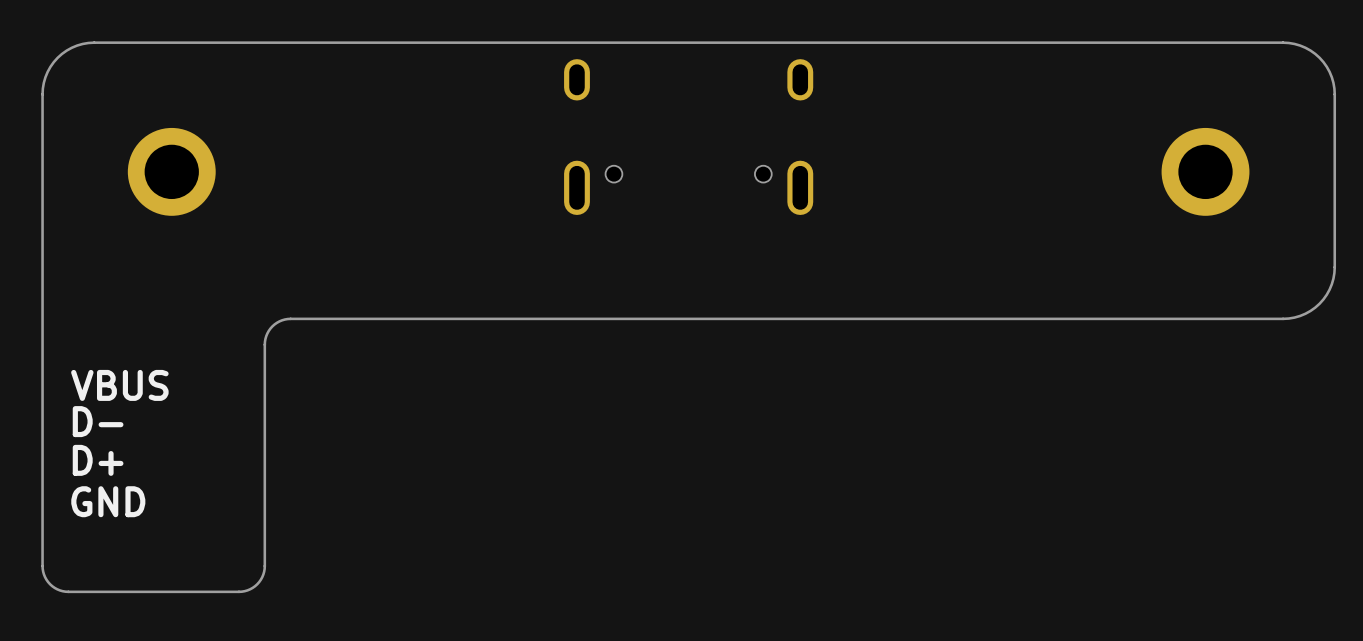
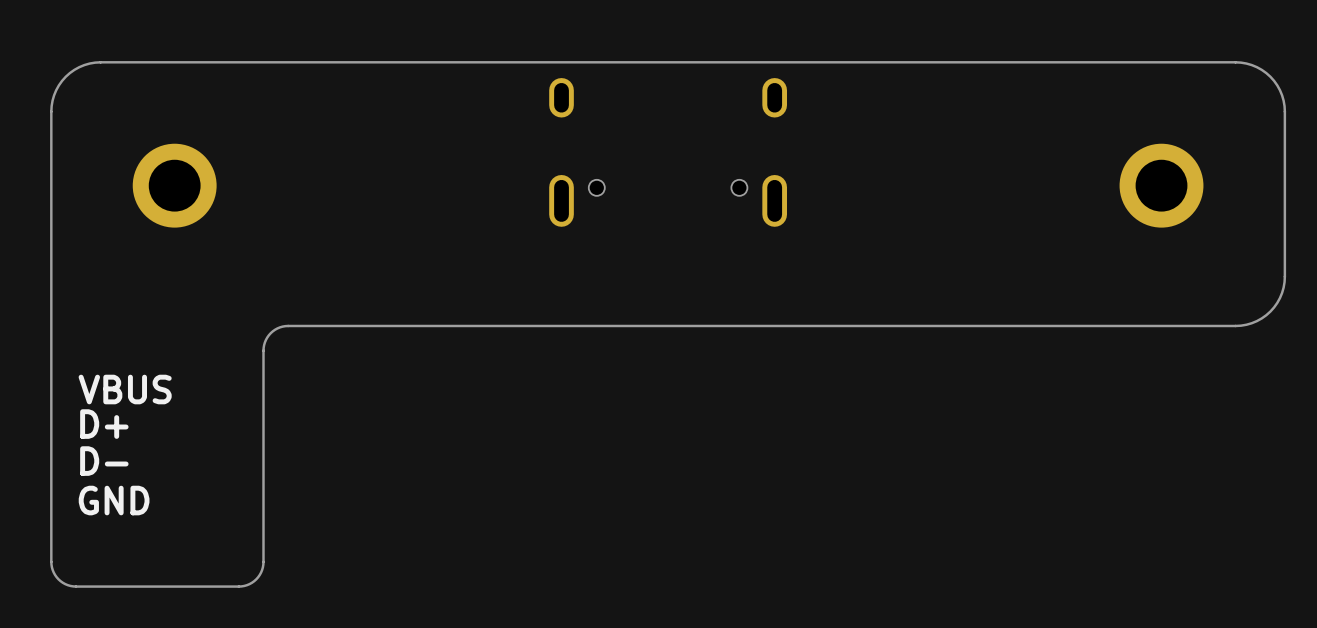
text: D- (98, 421) -> D+ (104, 424)
text: D+ (98, 460) -> D- (104, 461)

